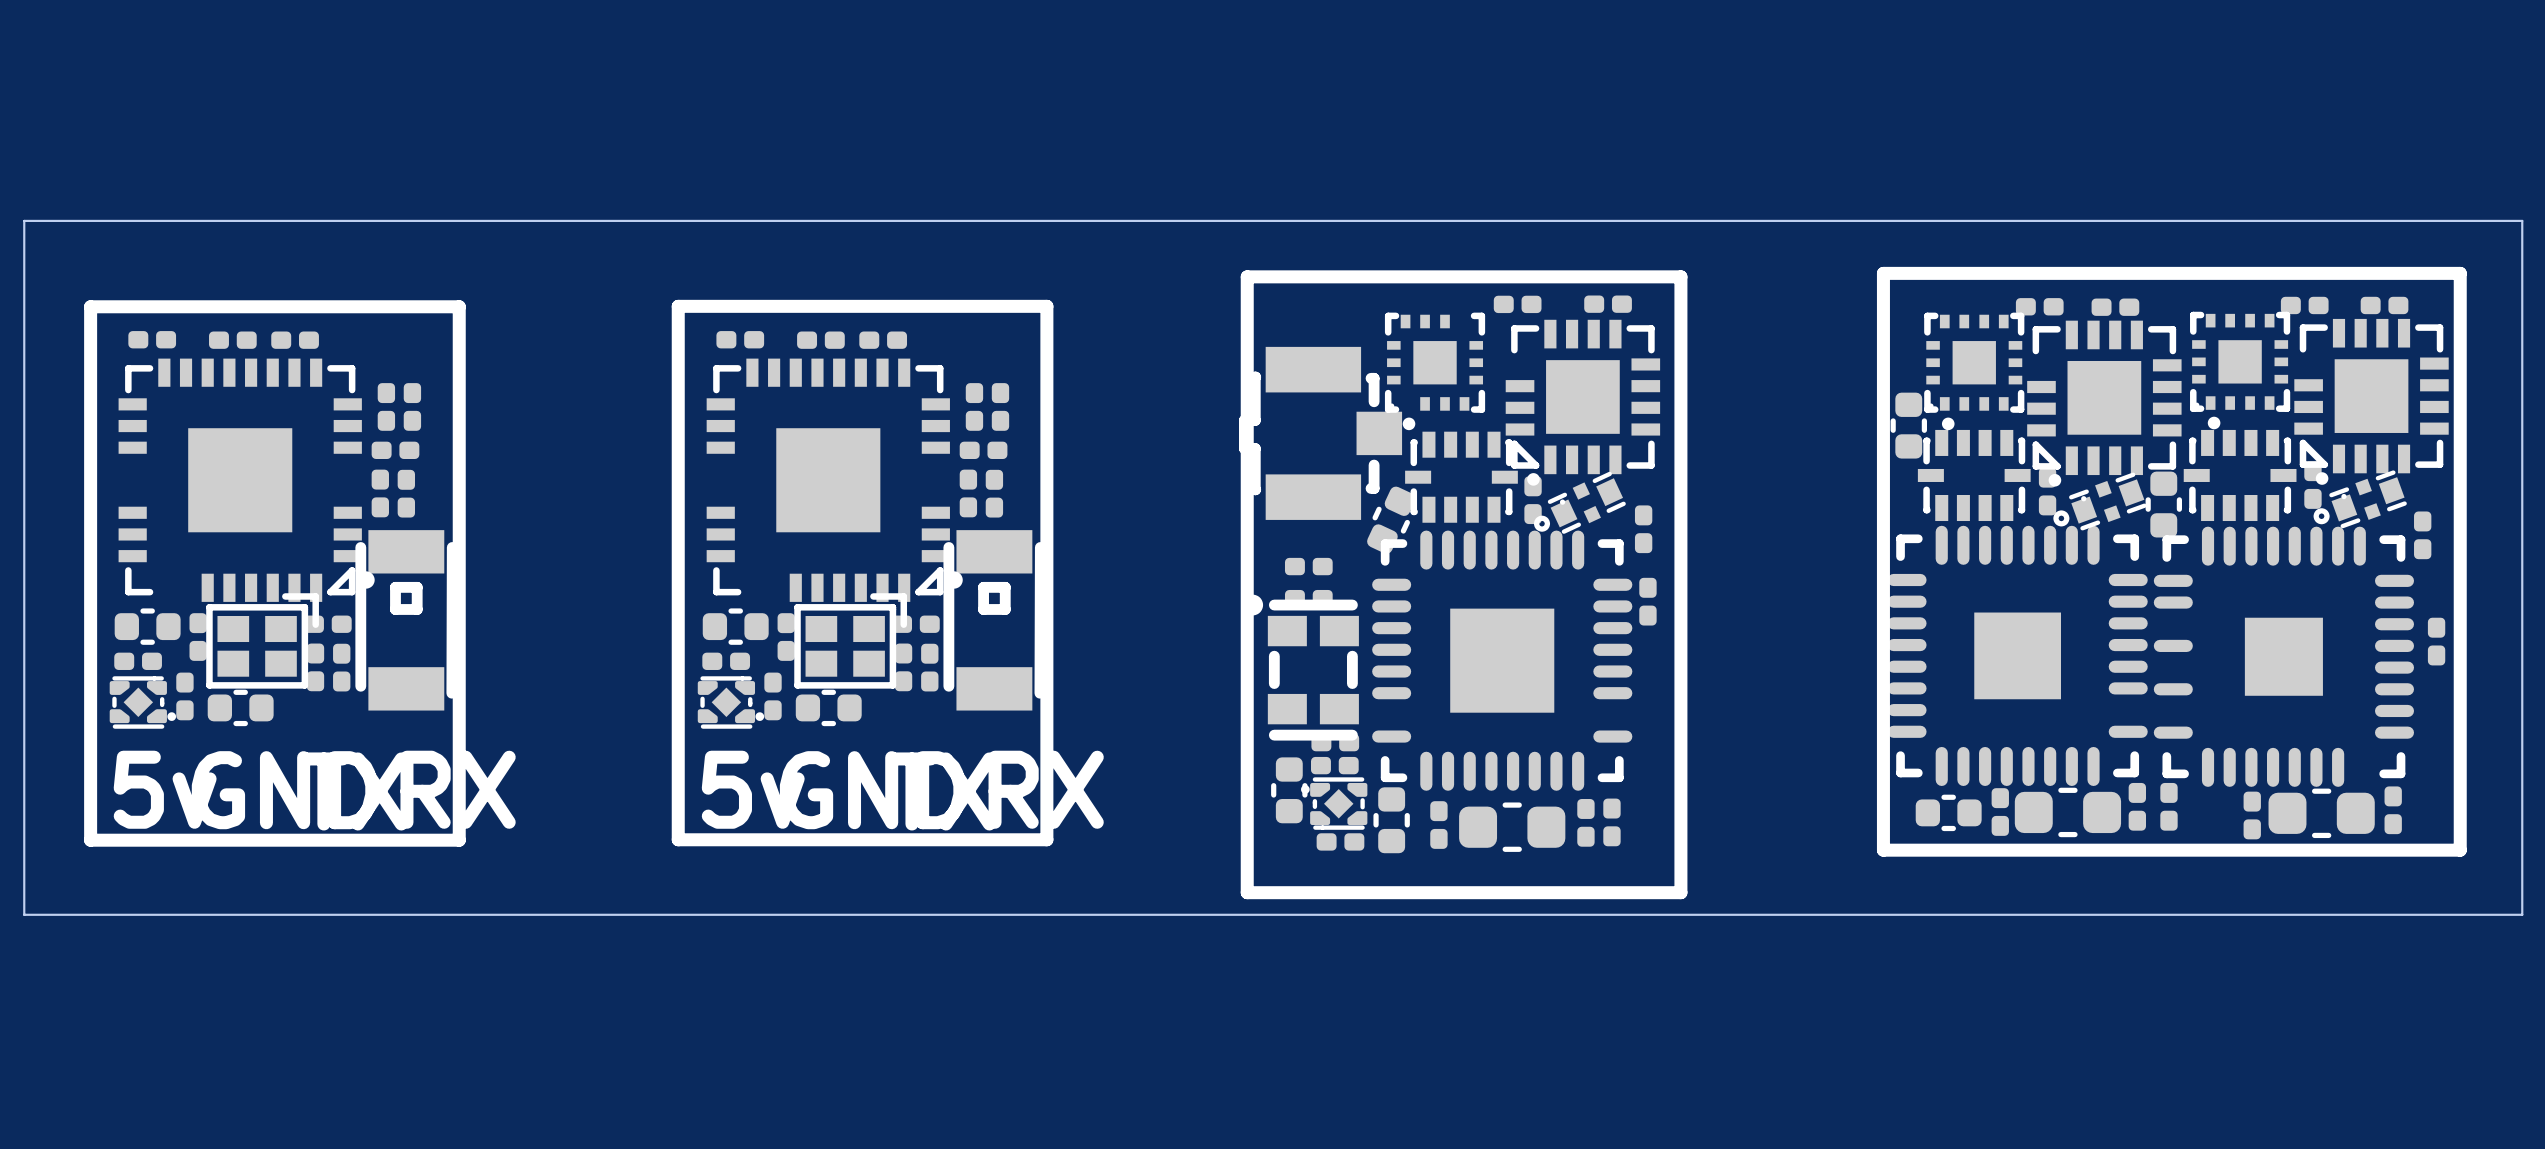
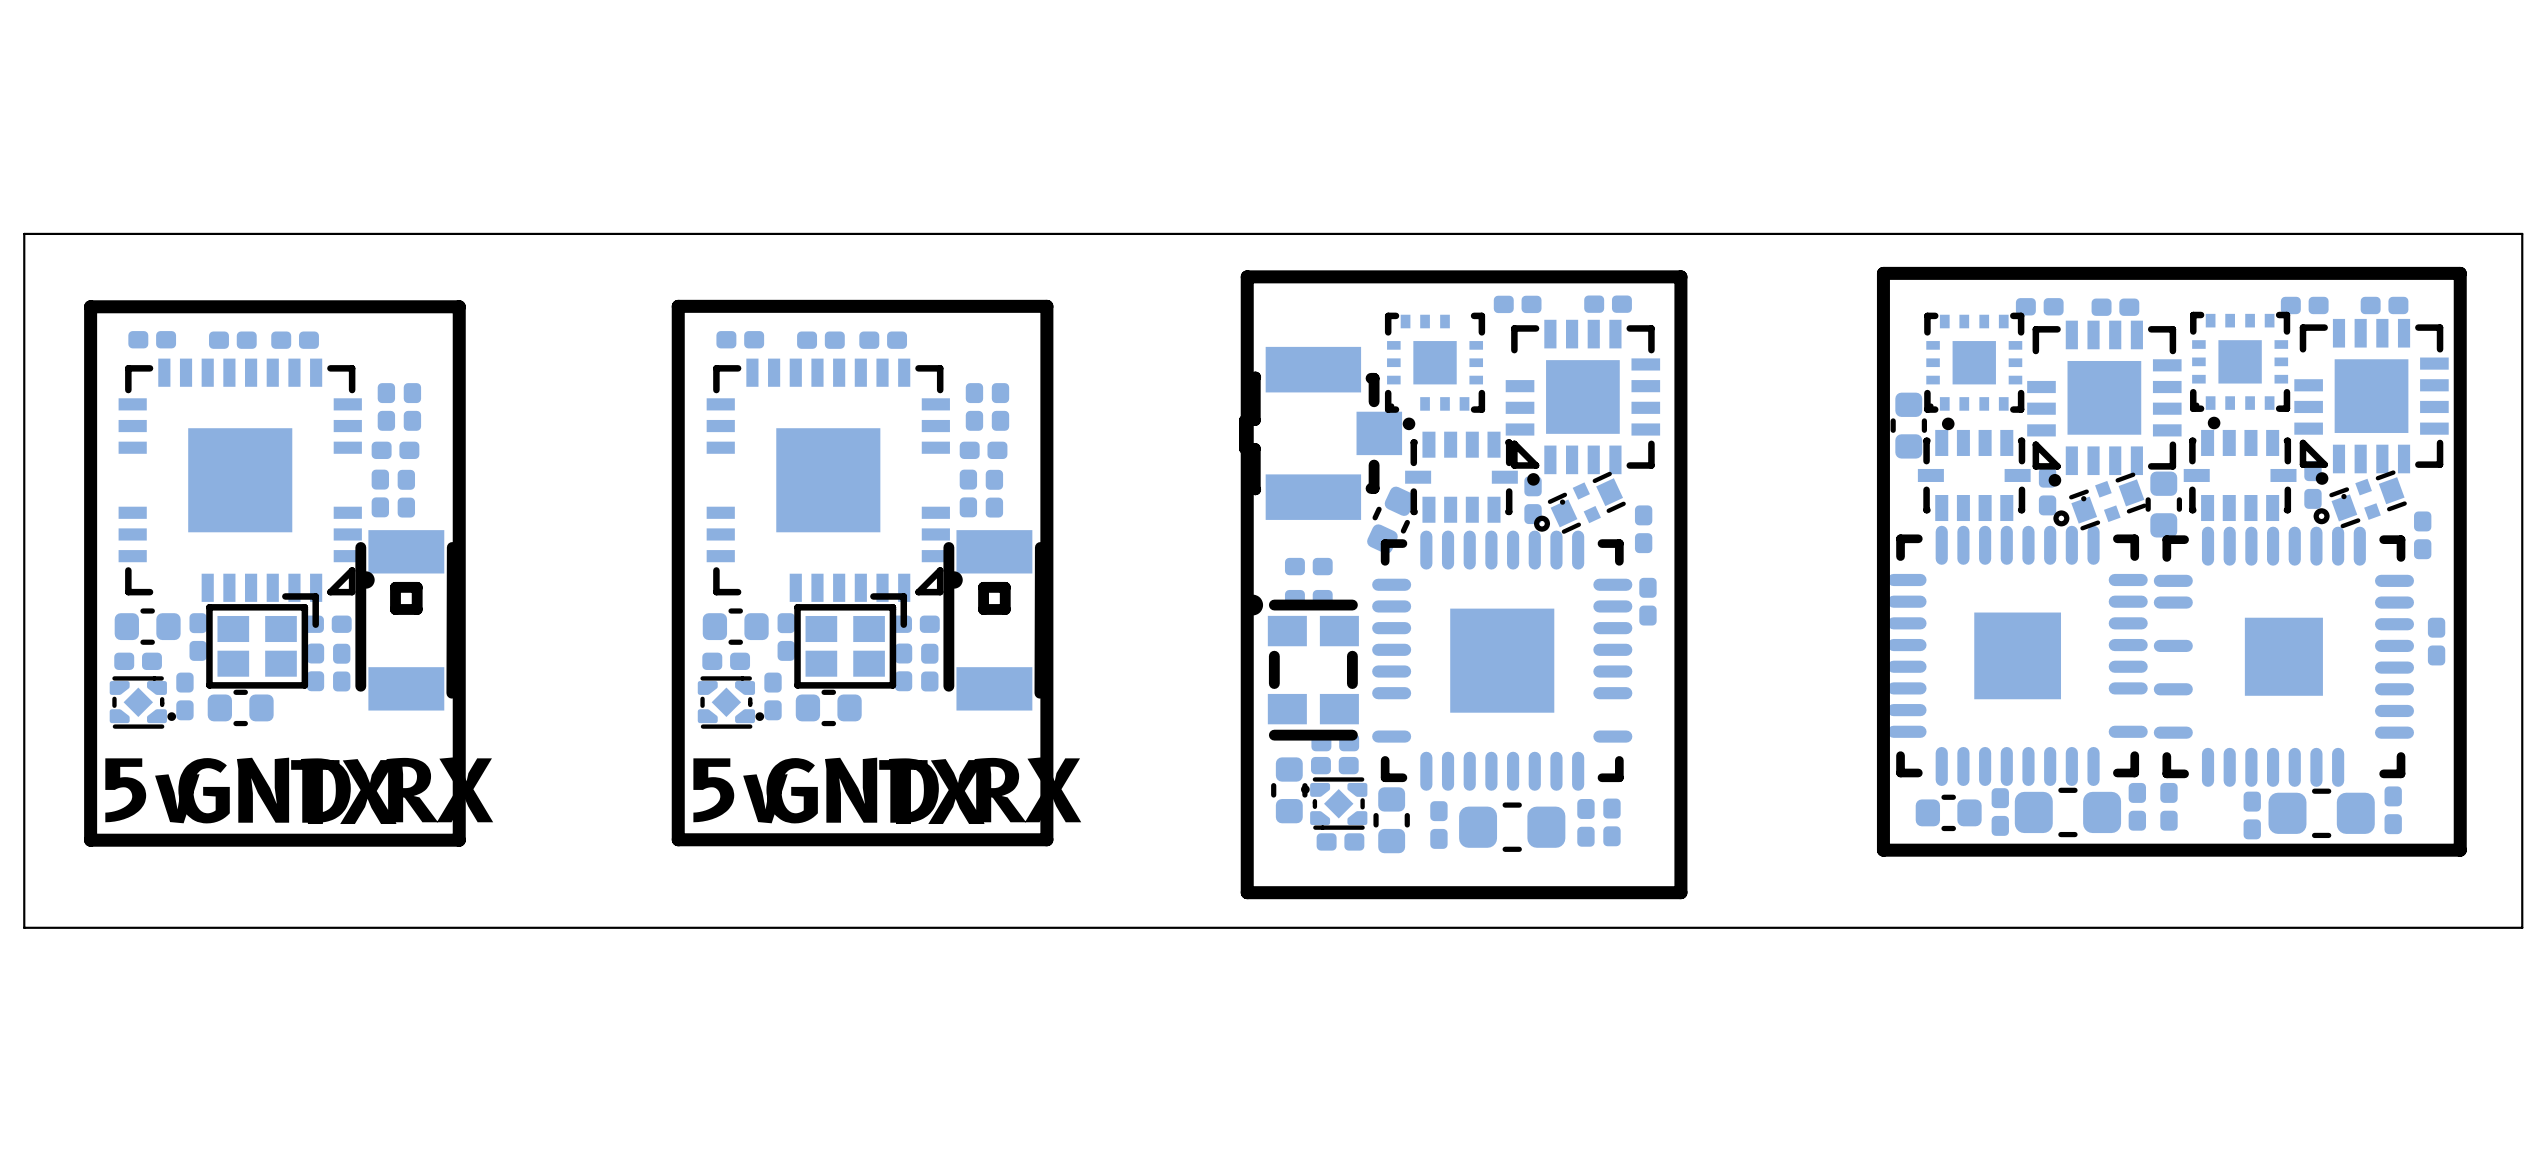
board edge: (2522, 233) (2522, 220) (24, 220) (24, 233) -> (2522, 233) (24, 233)
board edge: (2522, 914) (24, 914) -> (2522, 914) (2522, 927) (24, 927) (24, 914)

